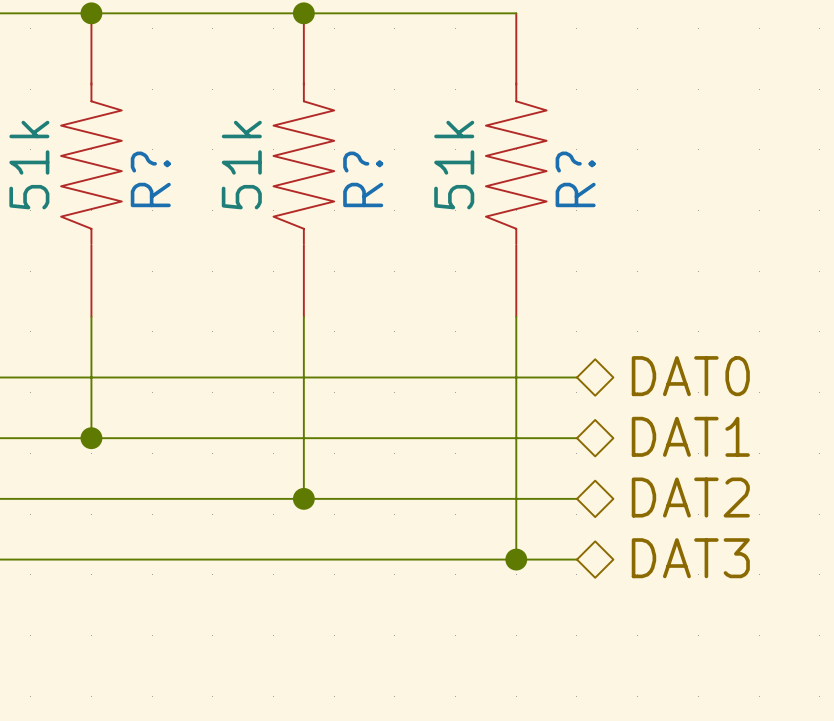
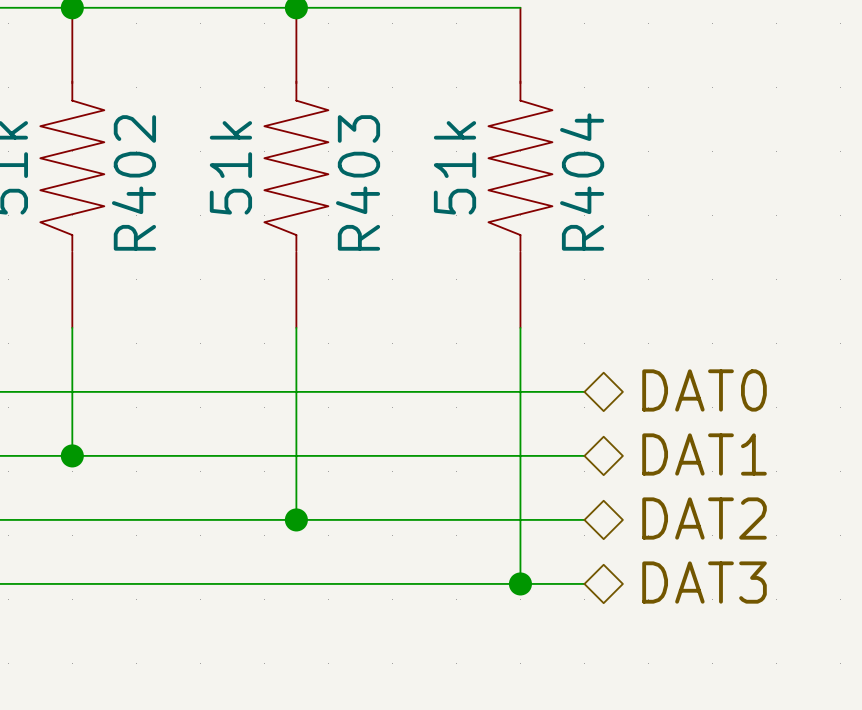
R? name: R? (150, 179) -> R402 (133, 182)
R? name: R? (363, 179) -> R403 (358, 182)
R? name: R? (575, 179) -> R404 (582, 182)

